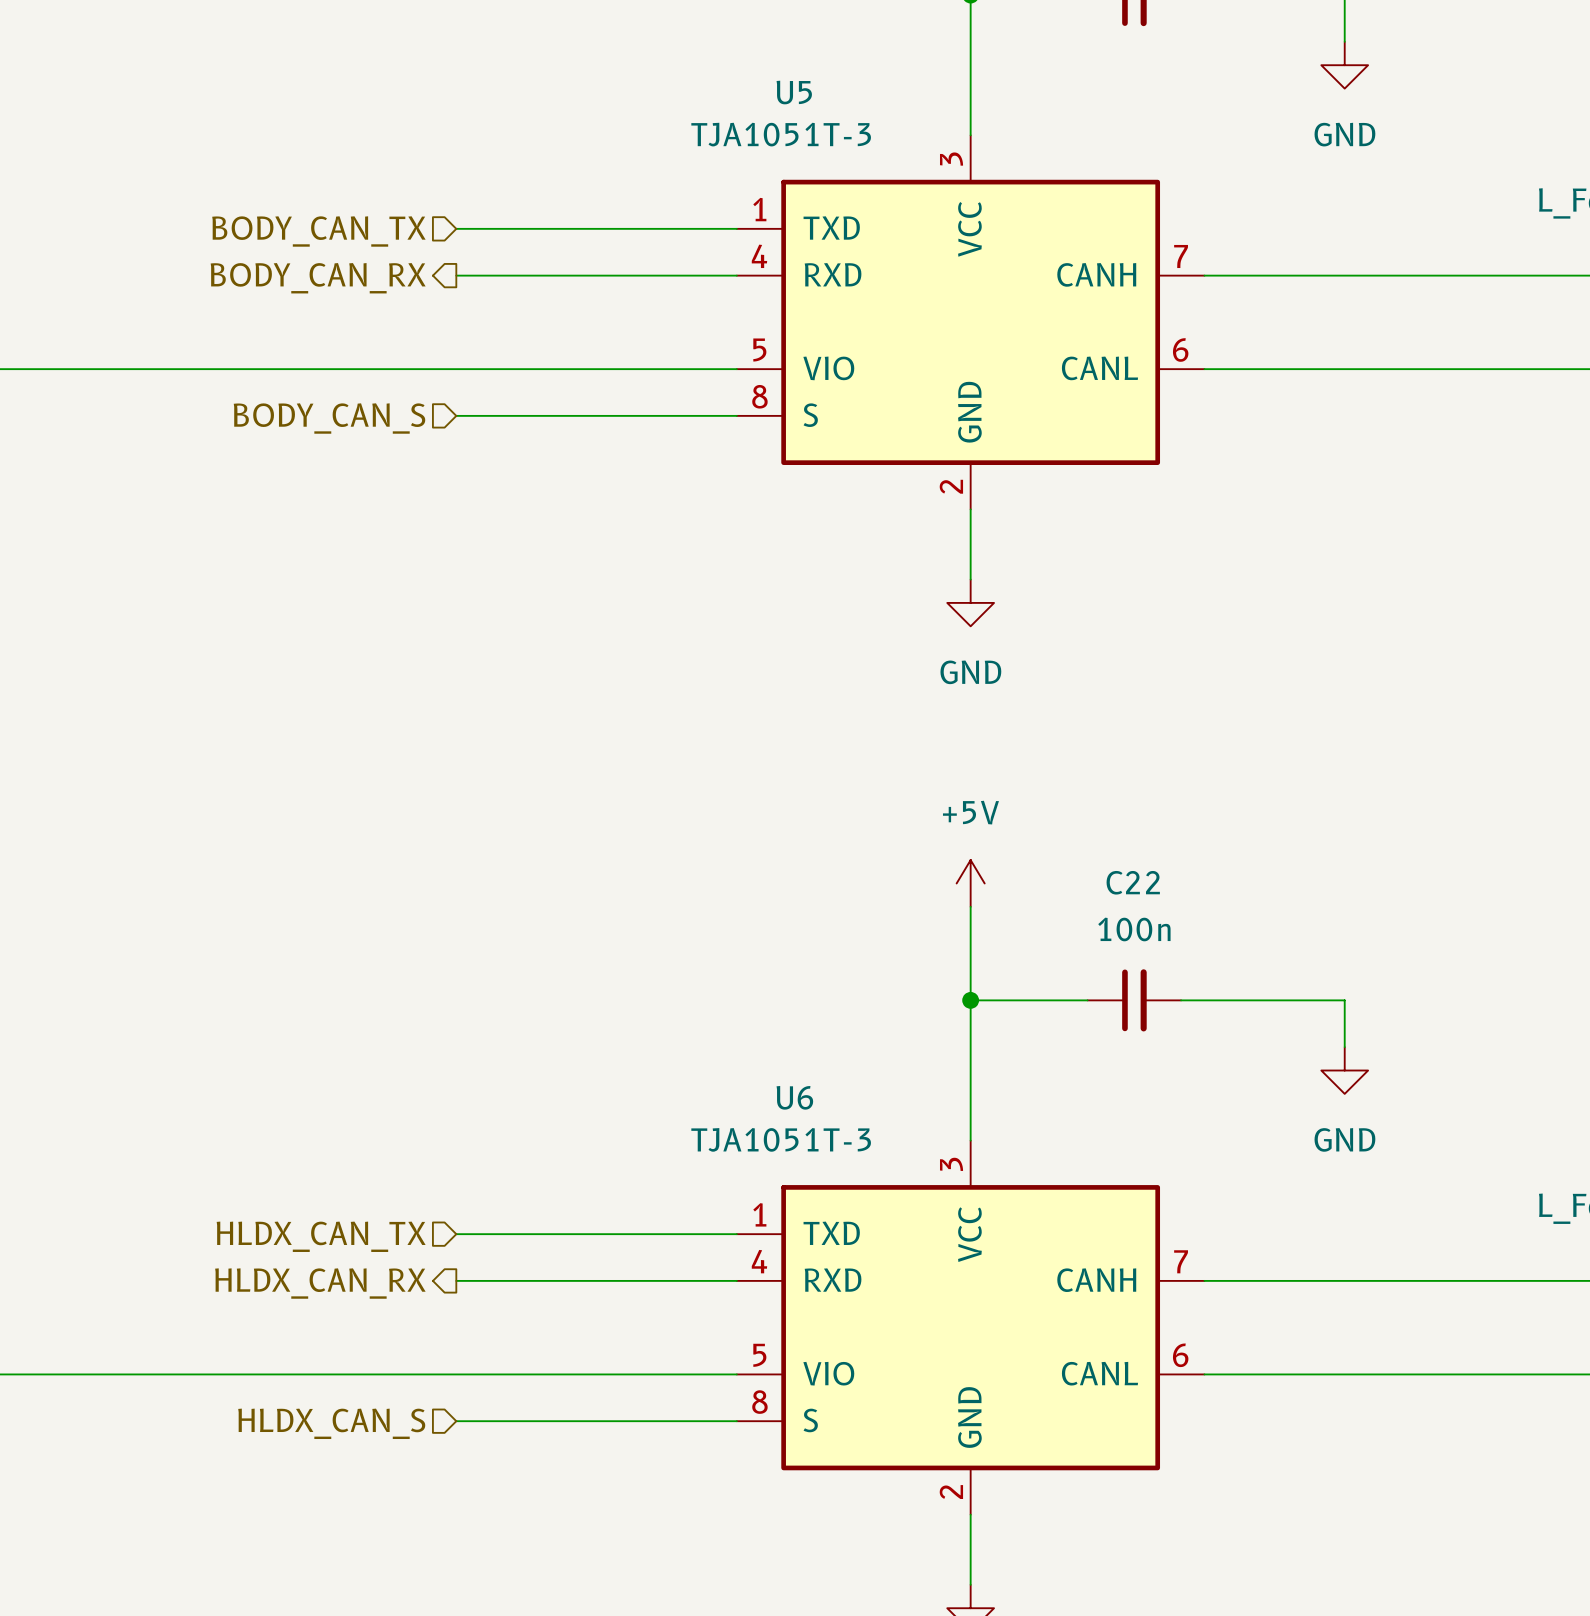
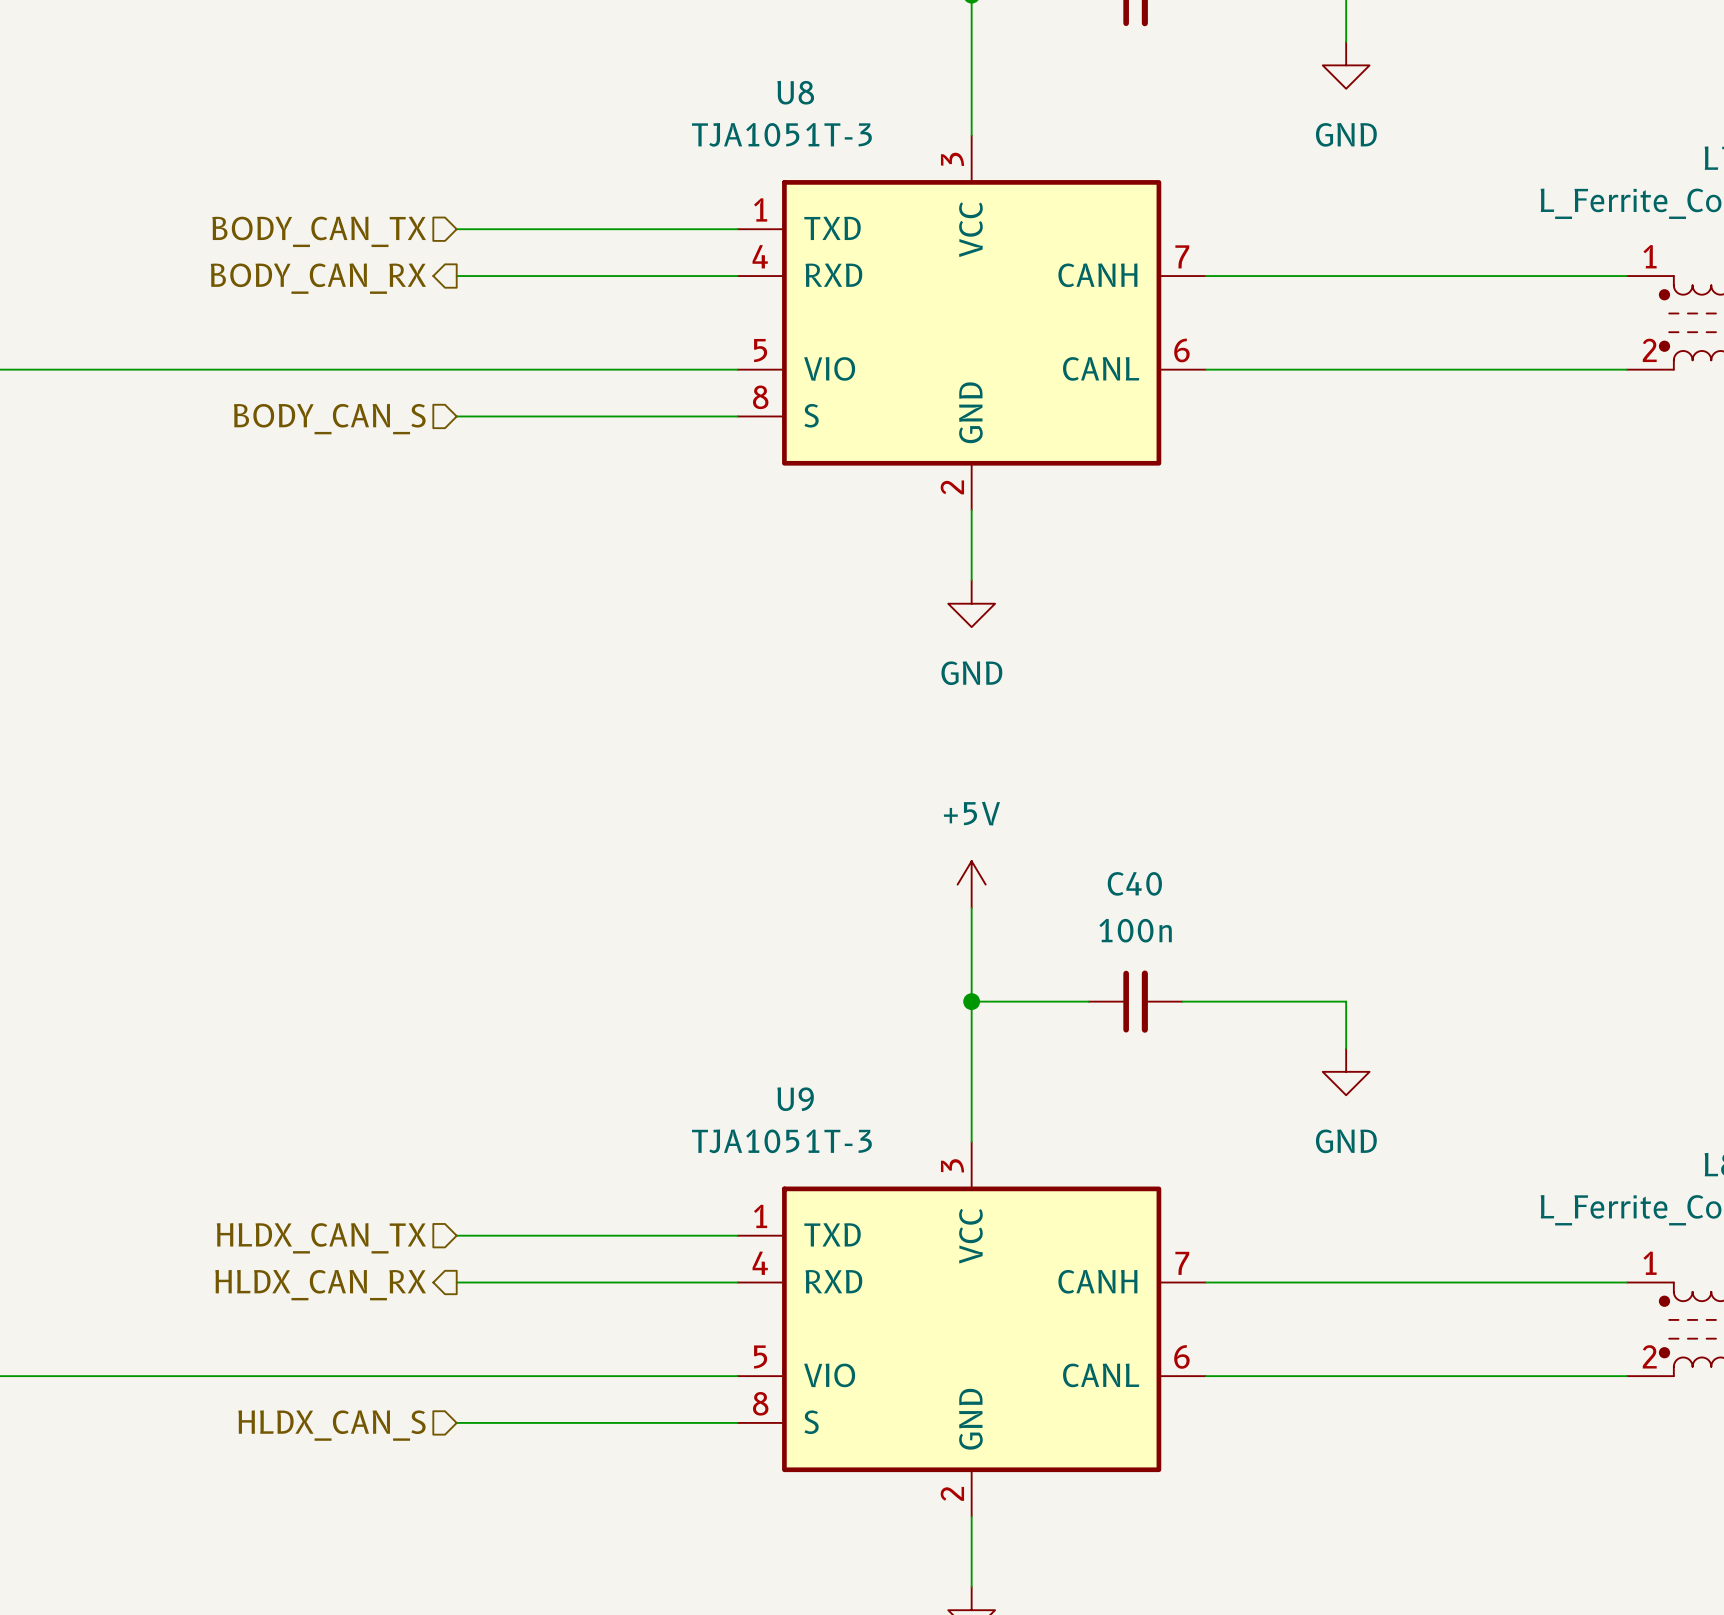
U5 name: U5 (794, 92) -> U8 (795, 92)
C22 name: C22 (1133, 882) -> C40 (1134, 883)
U6 name: U6 (794, 1097) -> U9 (795, 1099)

